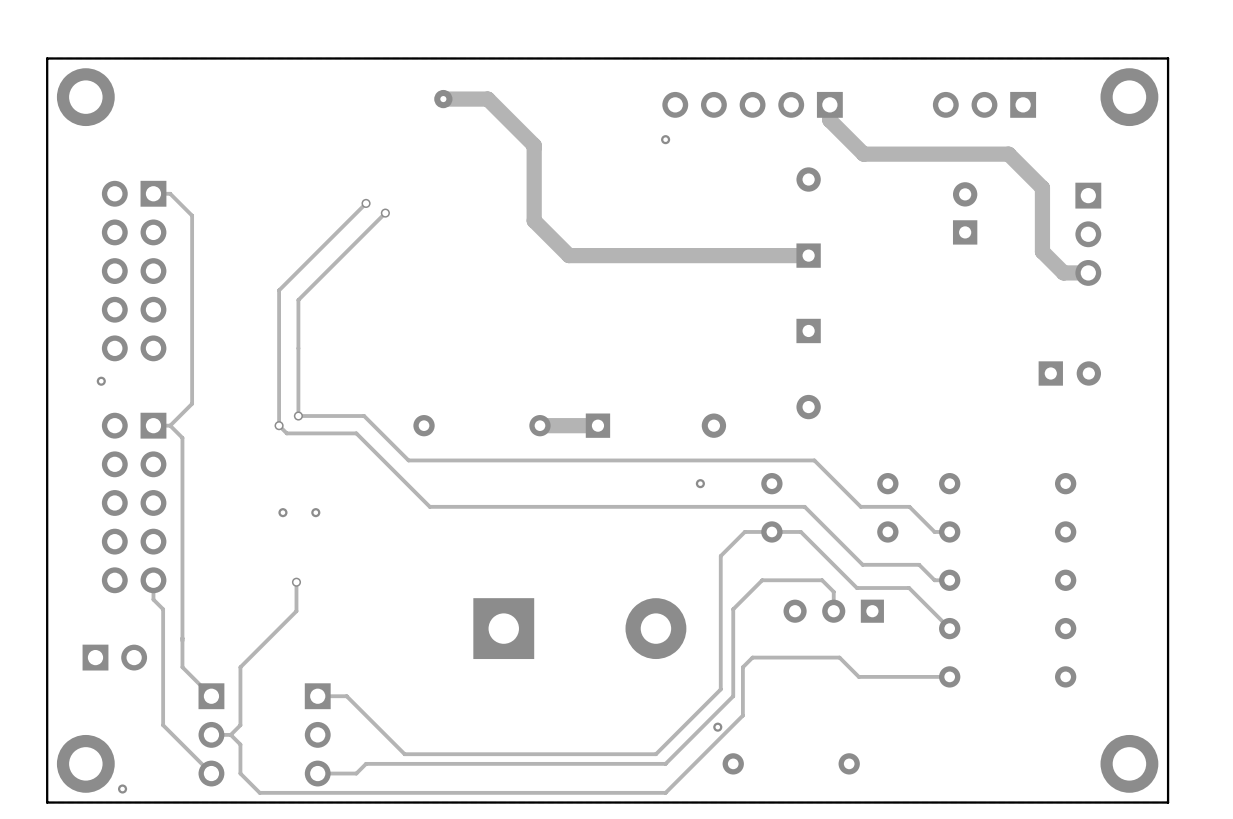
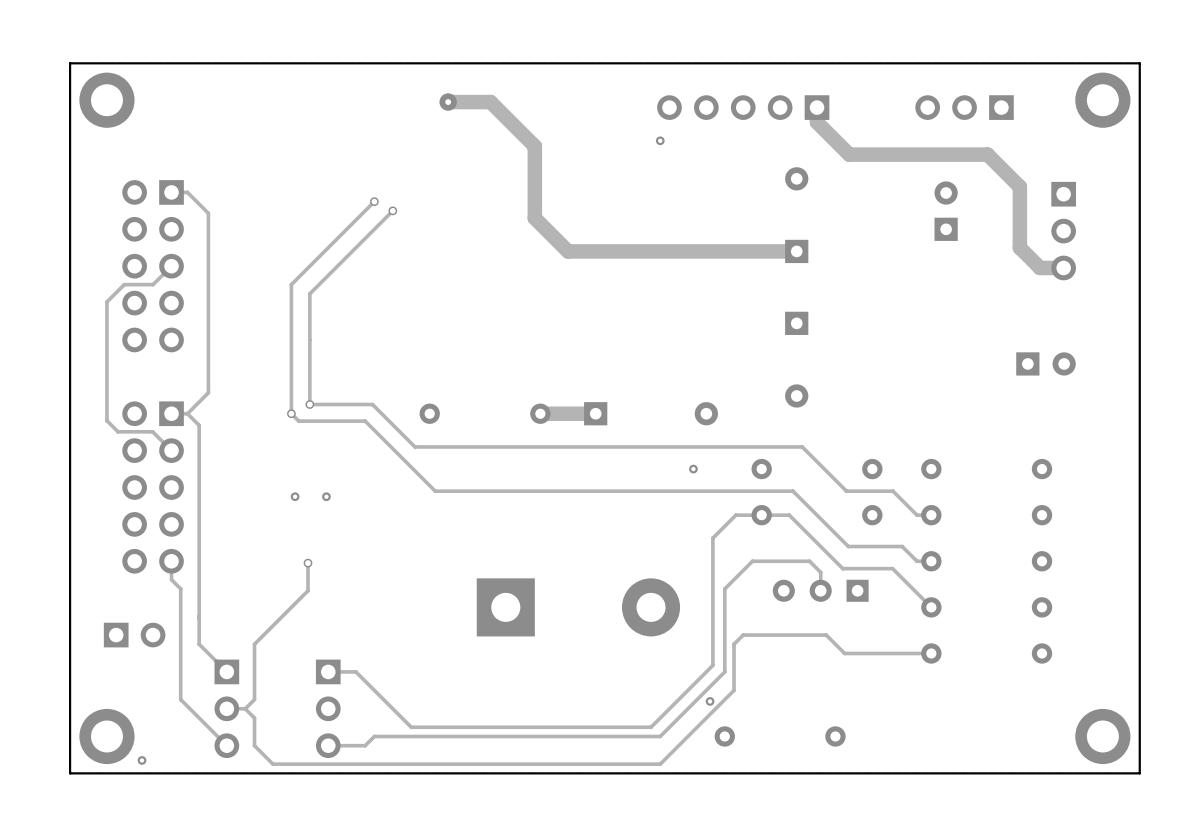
track: none -> (171, 266) (153, 284) (124, 284) (106, 301) (106, 420) (118, 431) (152, 431) (171, 450)
part: (101, 381) -> none

